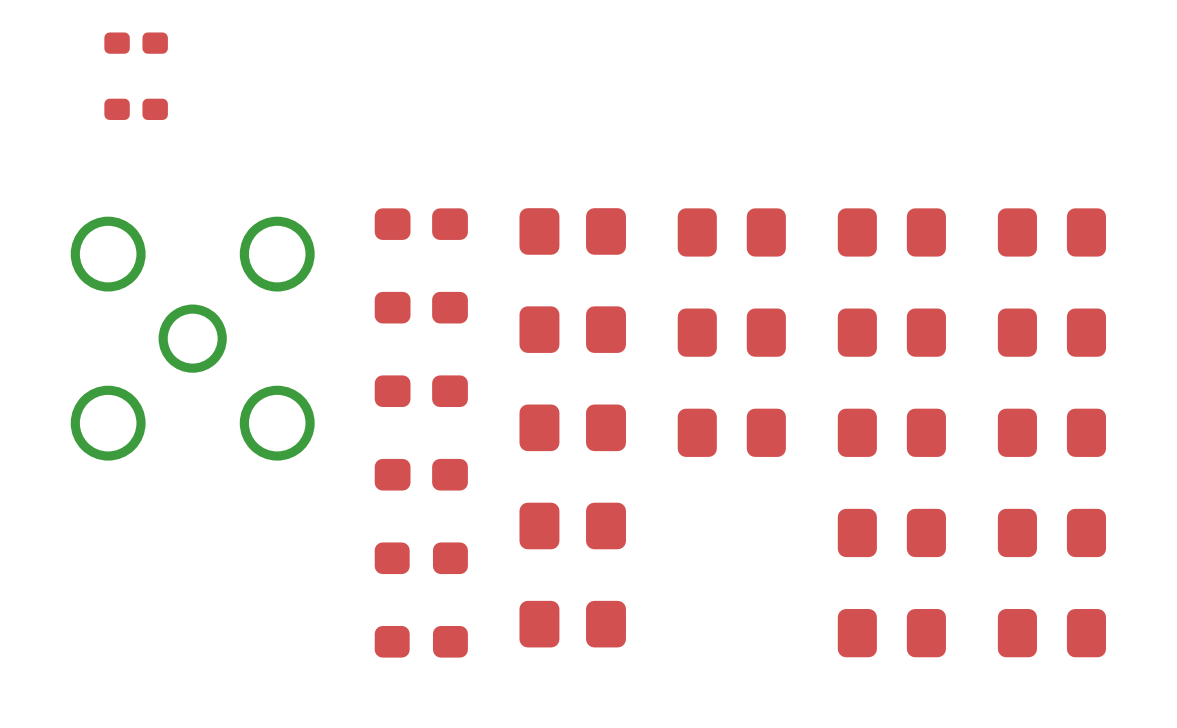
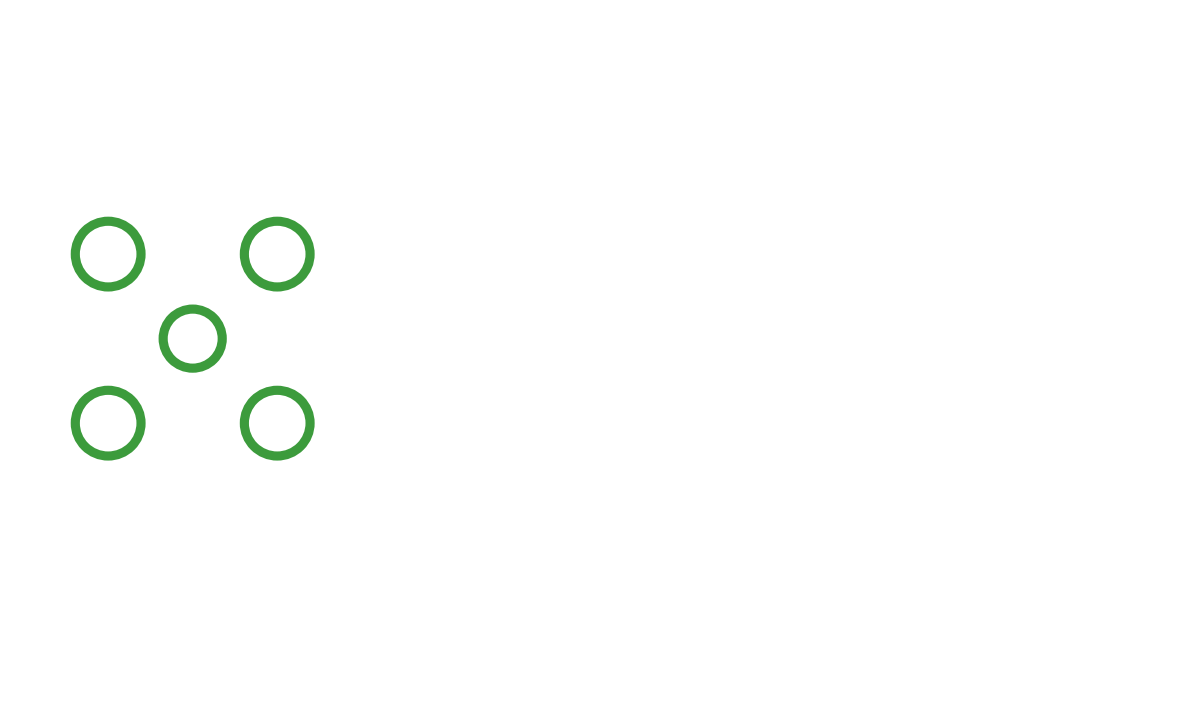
part: (136, 43) -> none
part: (136, 109) -> none
part: (421, 224) -> none
part: (572, 231) -> none
part: (731, 232) -> none
part: (891, 232) -> none
part: (1051, 232) -> none
part: (421, 307) -> none
part: (572, 329) -> none
part: (731, 332) -> none
part: (891, 332) -> none
part: (1051, 332) -> none
part: (421, 391) -> none
part: (572, 427) -> none
part: (731, 432) -> none
part: (891, 432) -> none
part: (1051, 432) -> none
part: (421, 474) -> none
part: (572, 525) -> none
part: (891, 532) -> none
part: (1051, 532) -> none
part: (421, 558) -> none
part: (572, 624) -> none
part: (891, 633) -> none
part: (1051, 633) -> none
part: (421, 641) -> none

